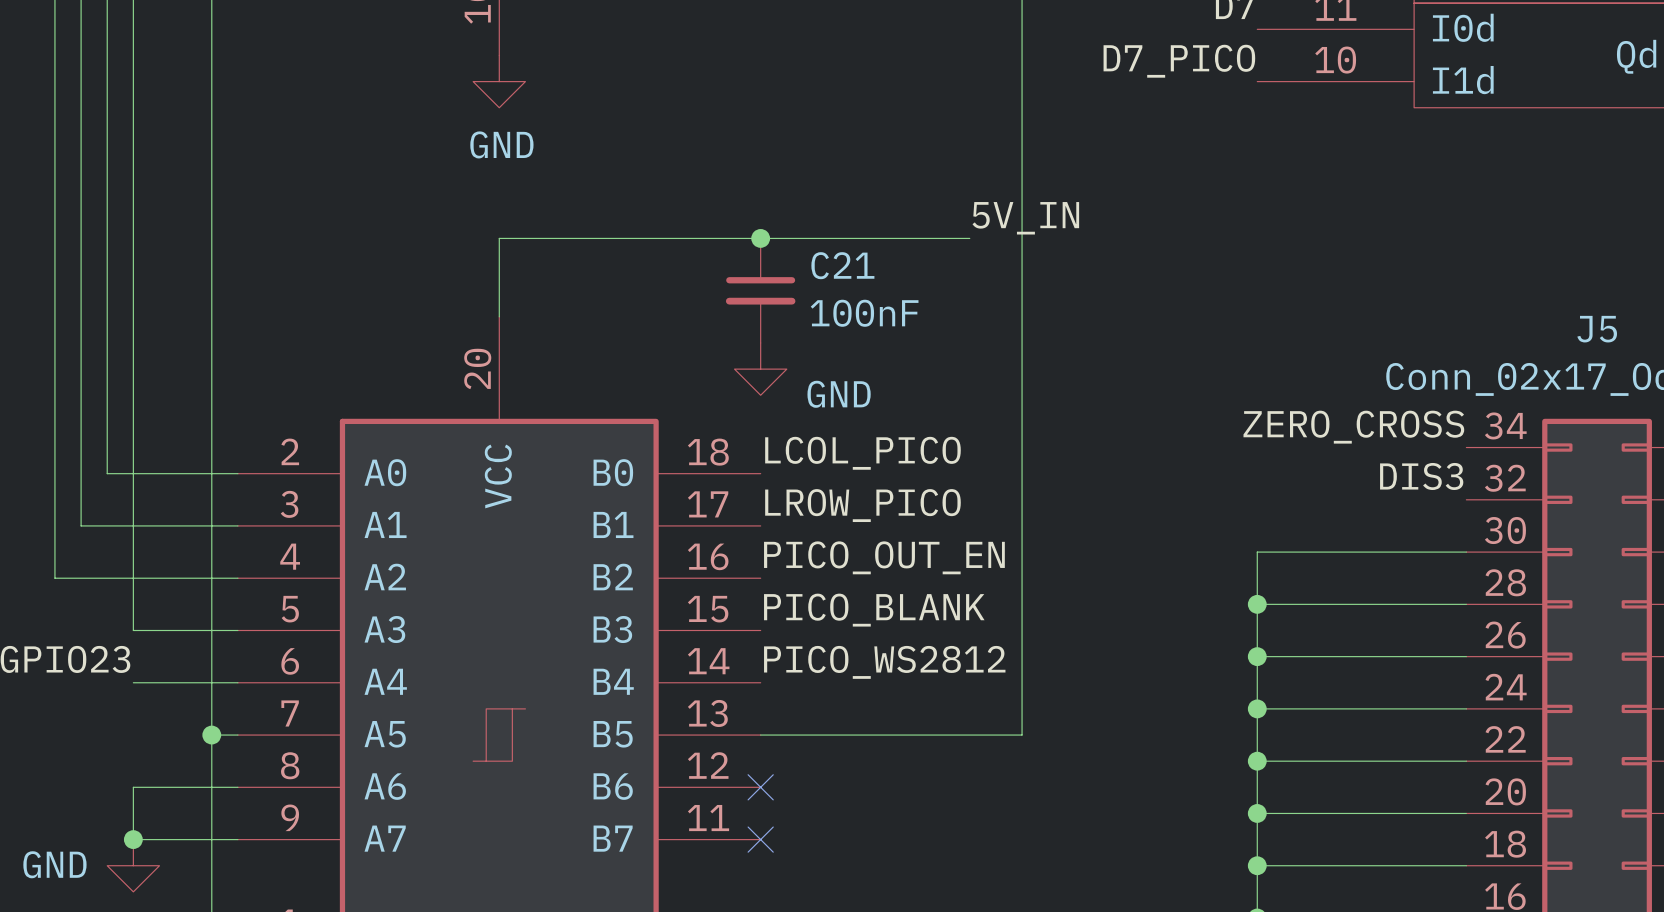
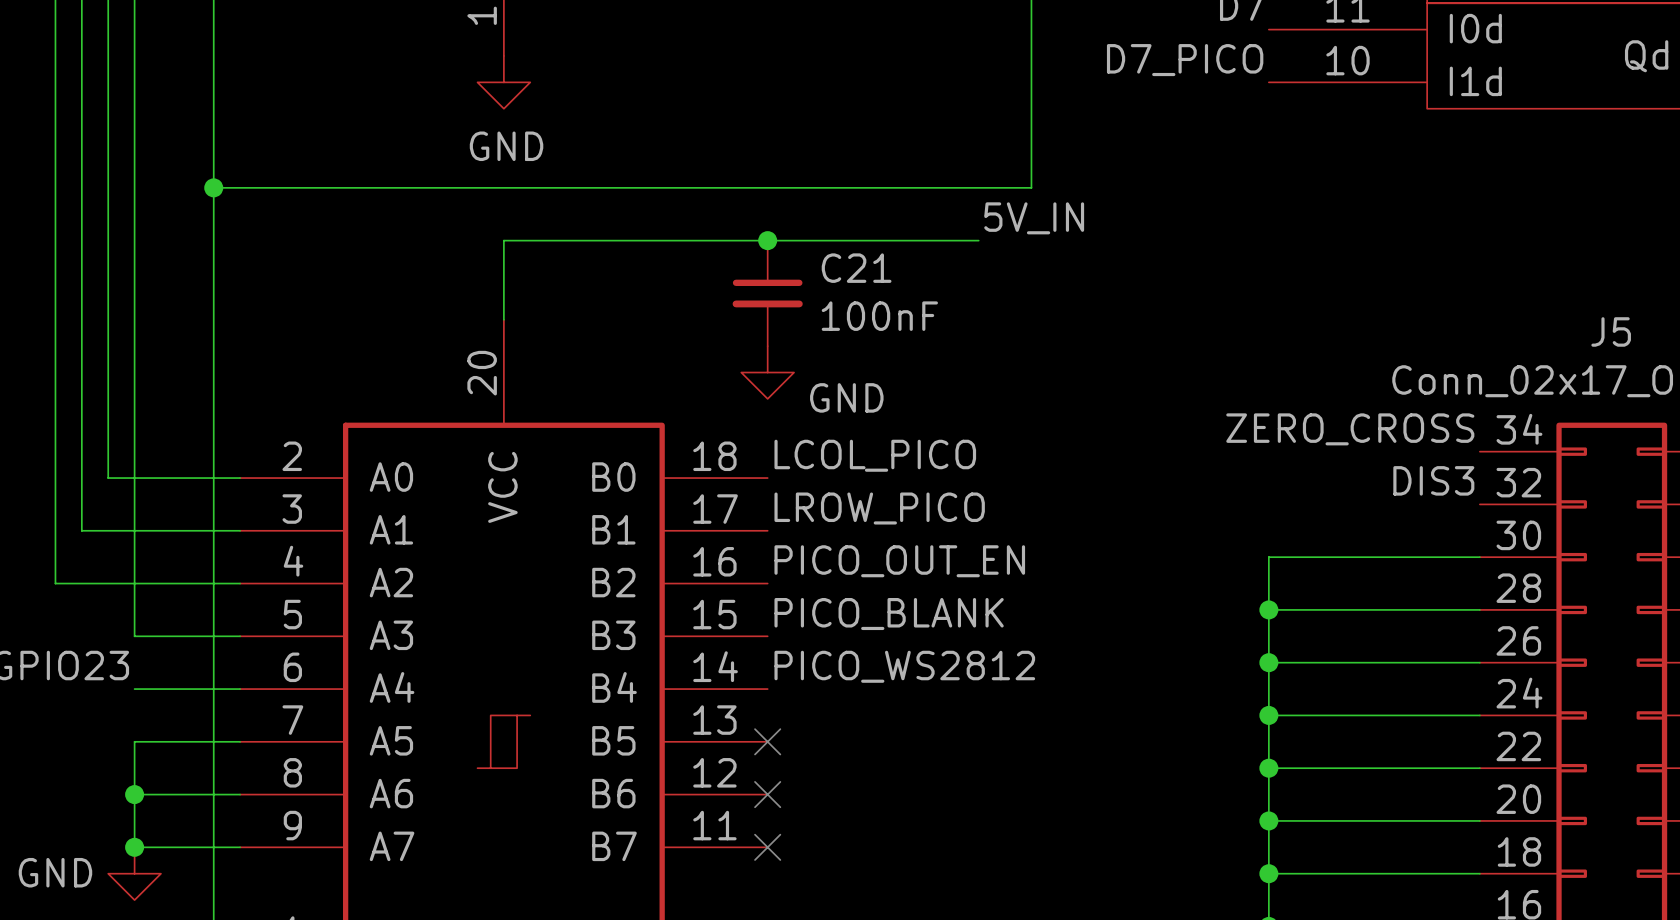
junction: none -> (213, 187)
wire: (1022, 186) (1022, 735) (760, 735) -> (1031, 187) (213, 187)
wire: none -> (213, 741) (134, 741) (134, 794)
junction position: (211, 735) -> (134, 794)
no-connect mark: none -> (767, 741)

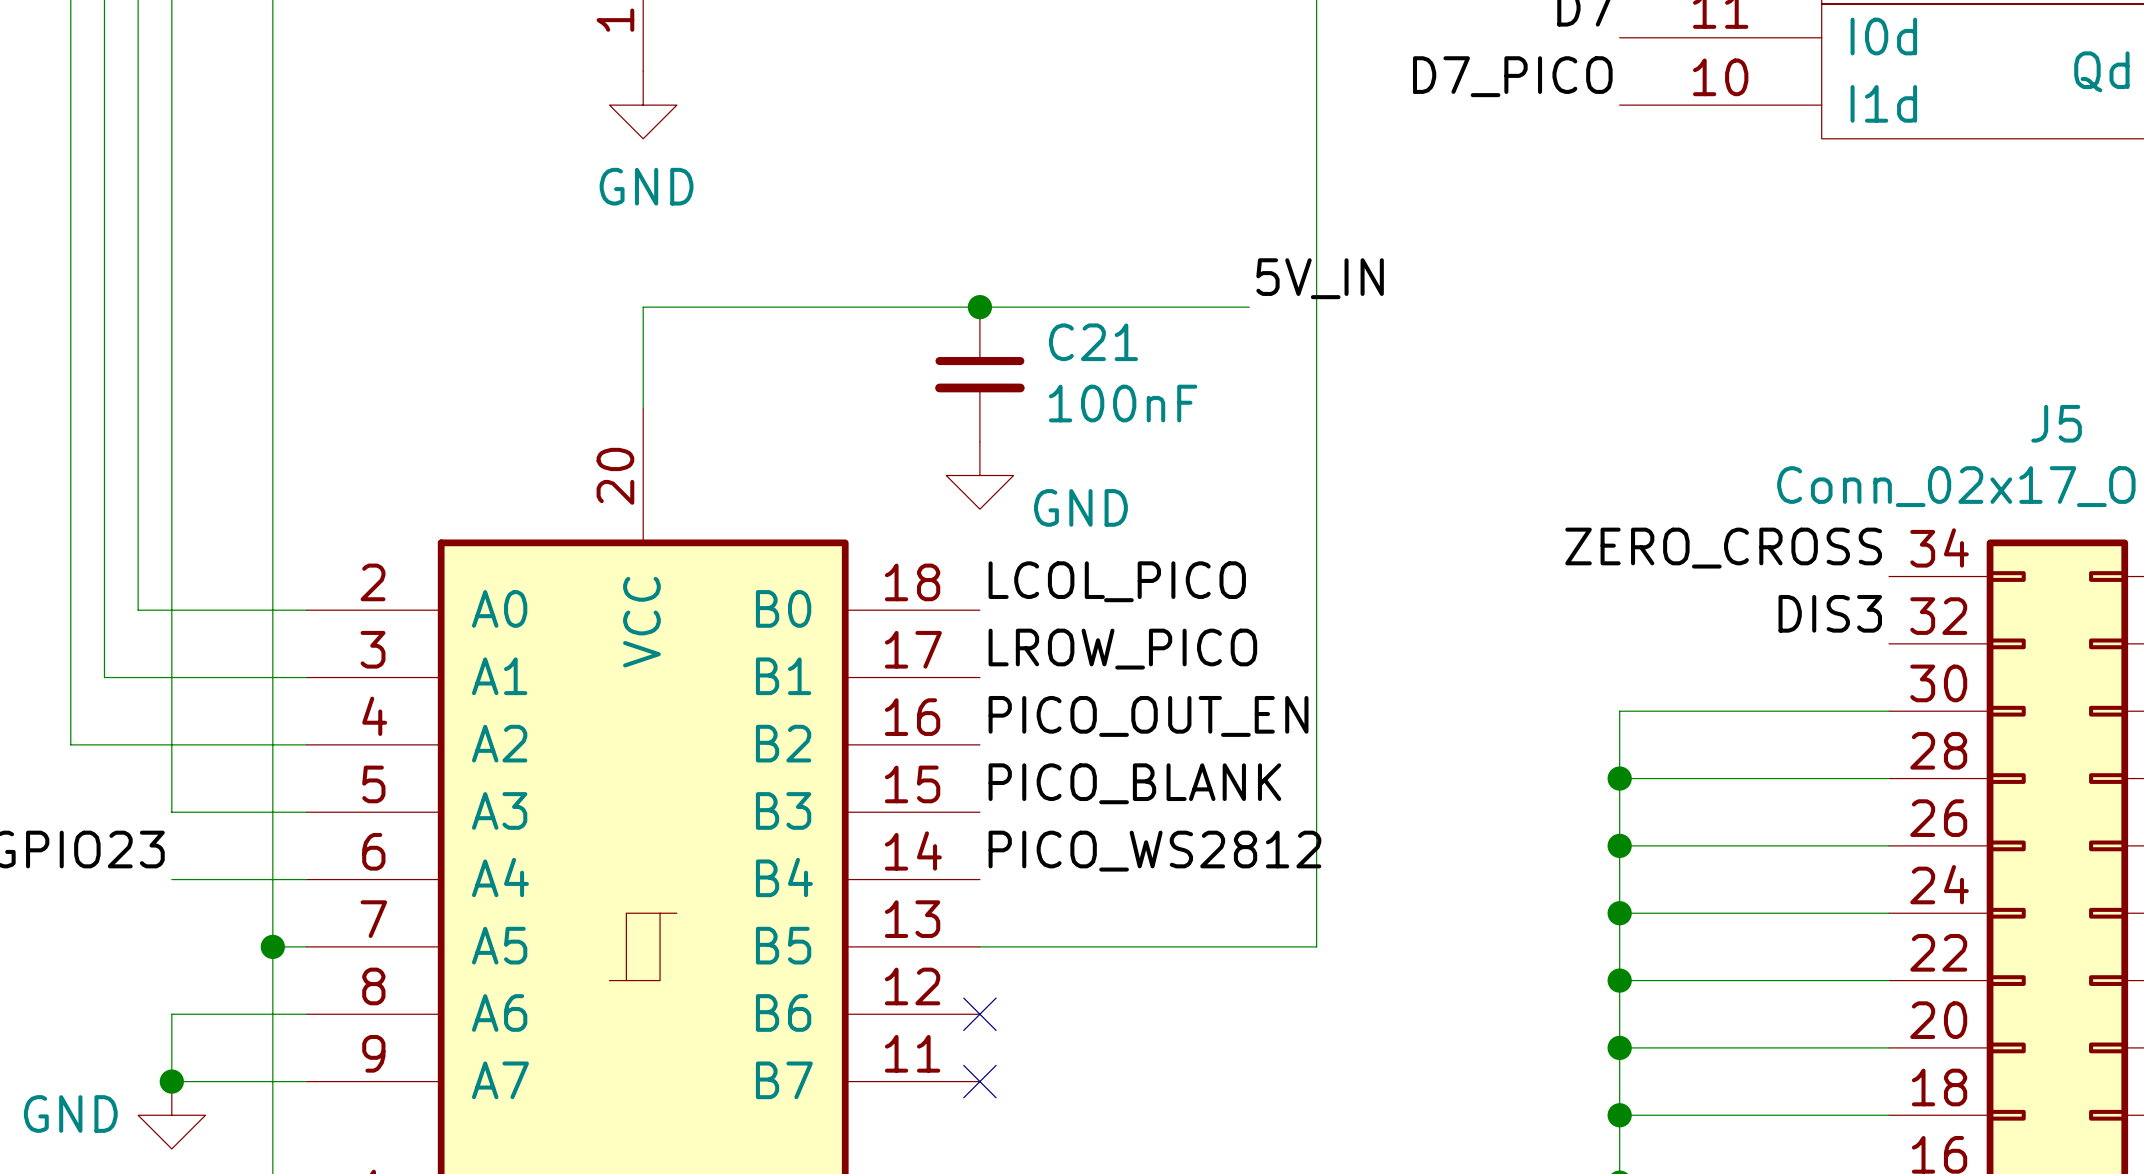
wire: (213, 187) (1031, 187) -> (979, 946) (1316, 946) (1316, 239)
junction: (213, 187) -> none
wire: (213, 741) (134, 741) (134, 794) -> none
no-connect mark: (767, 741) -> none
junction position: (134, 794) -> (272, 946)

